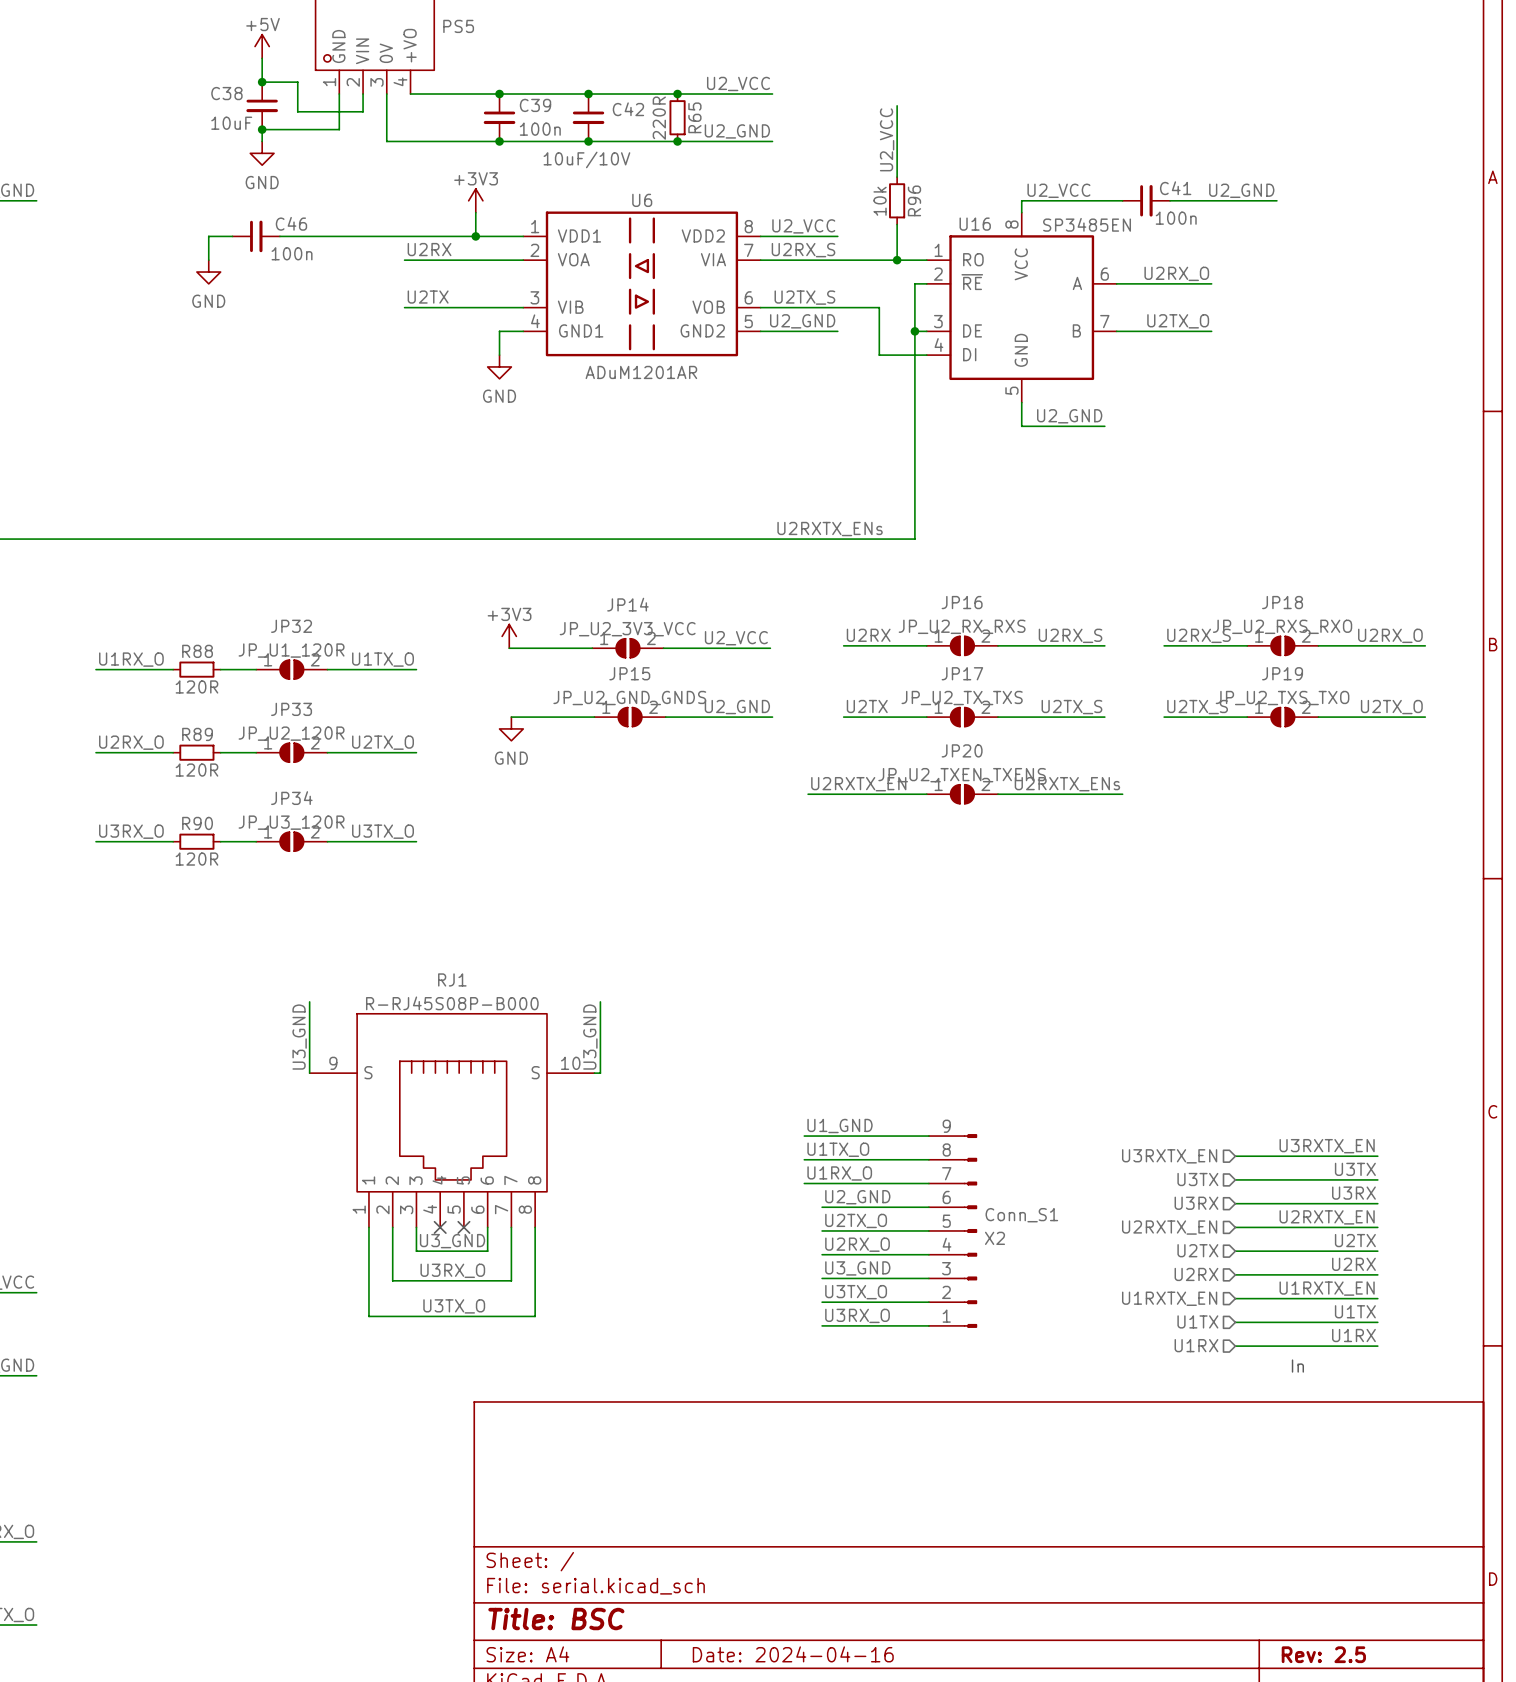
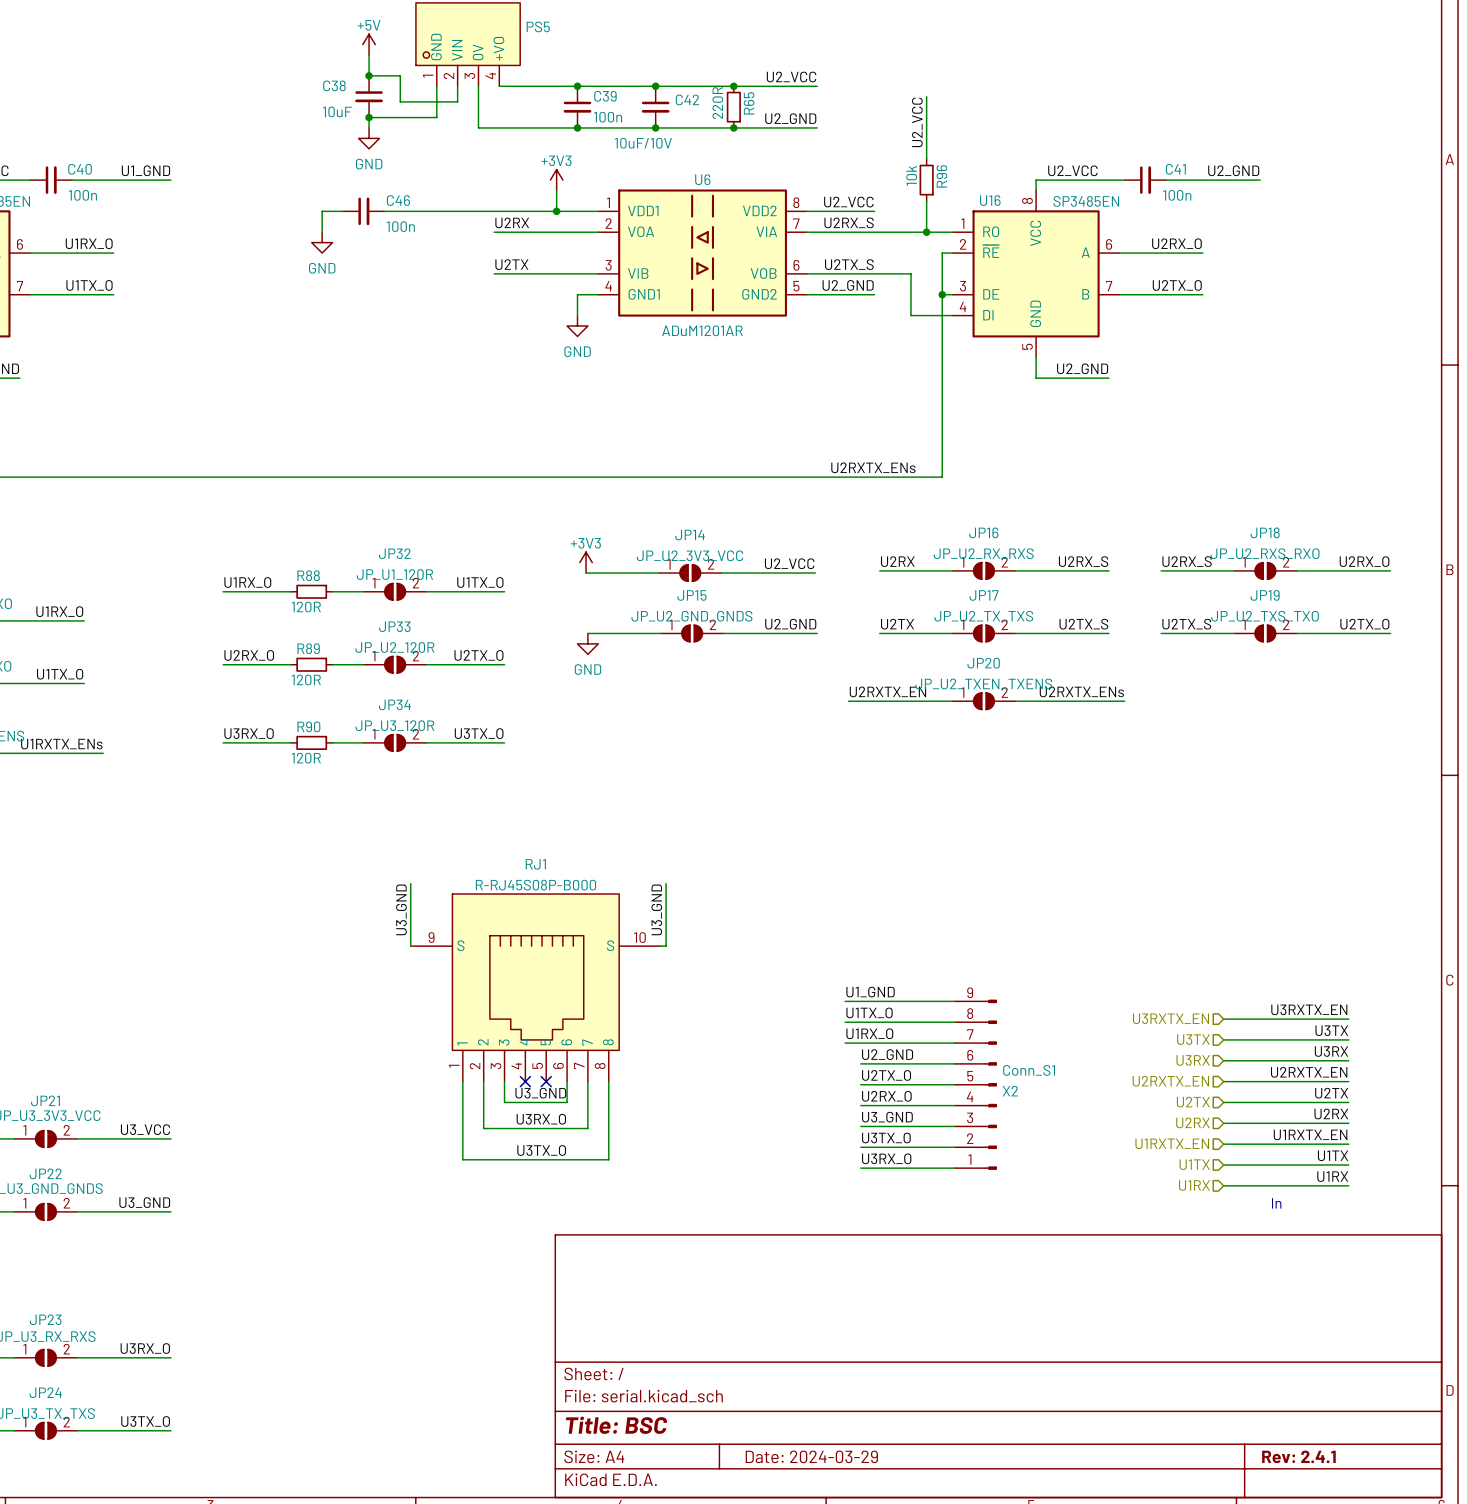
title block: Date: 2024-04-16 (793, 1654) -> Date: 2024-03-29 (811, 1456)
title block: Rev: 2.5 (1323, 1654) -> Rev: 2.4.1 (1298, 1456)

